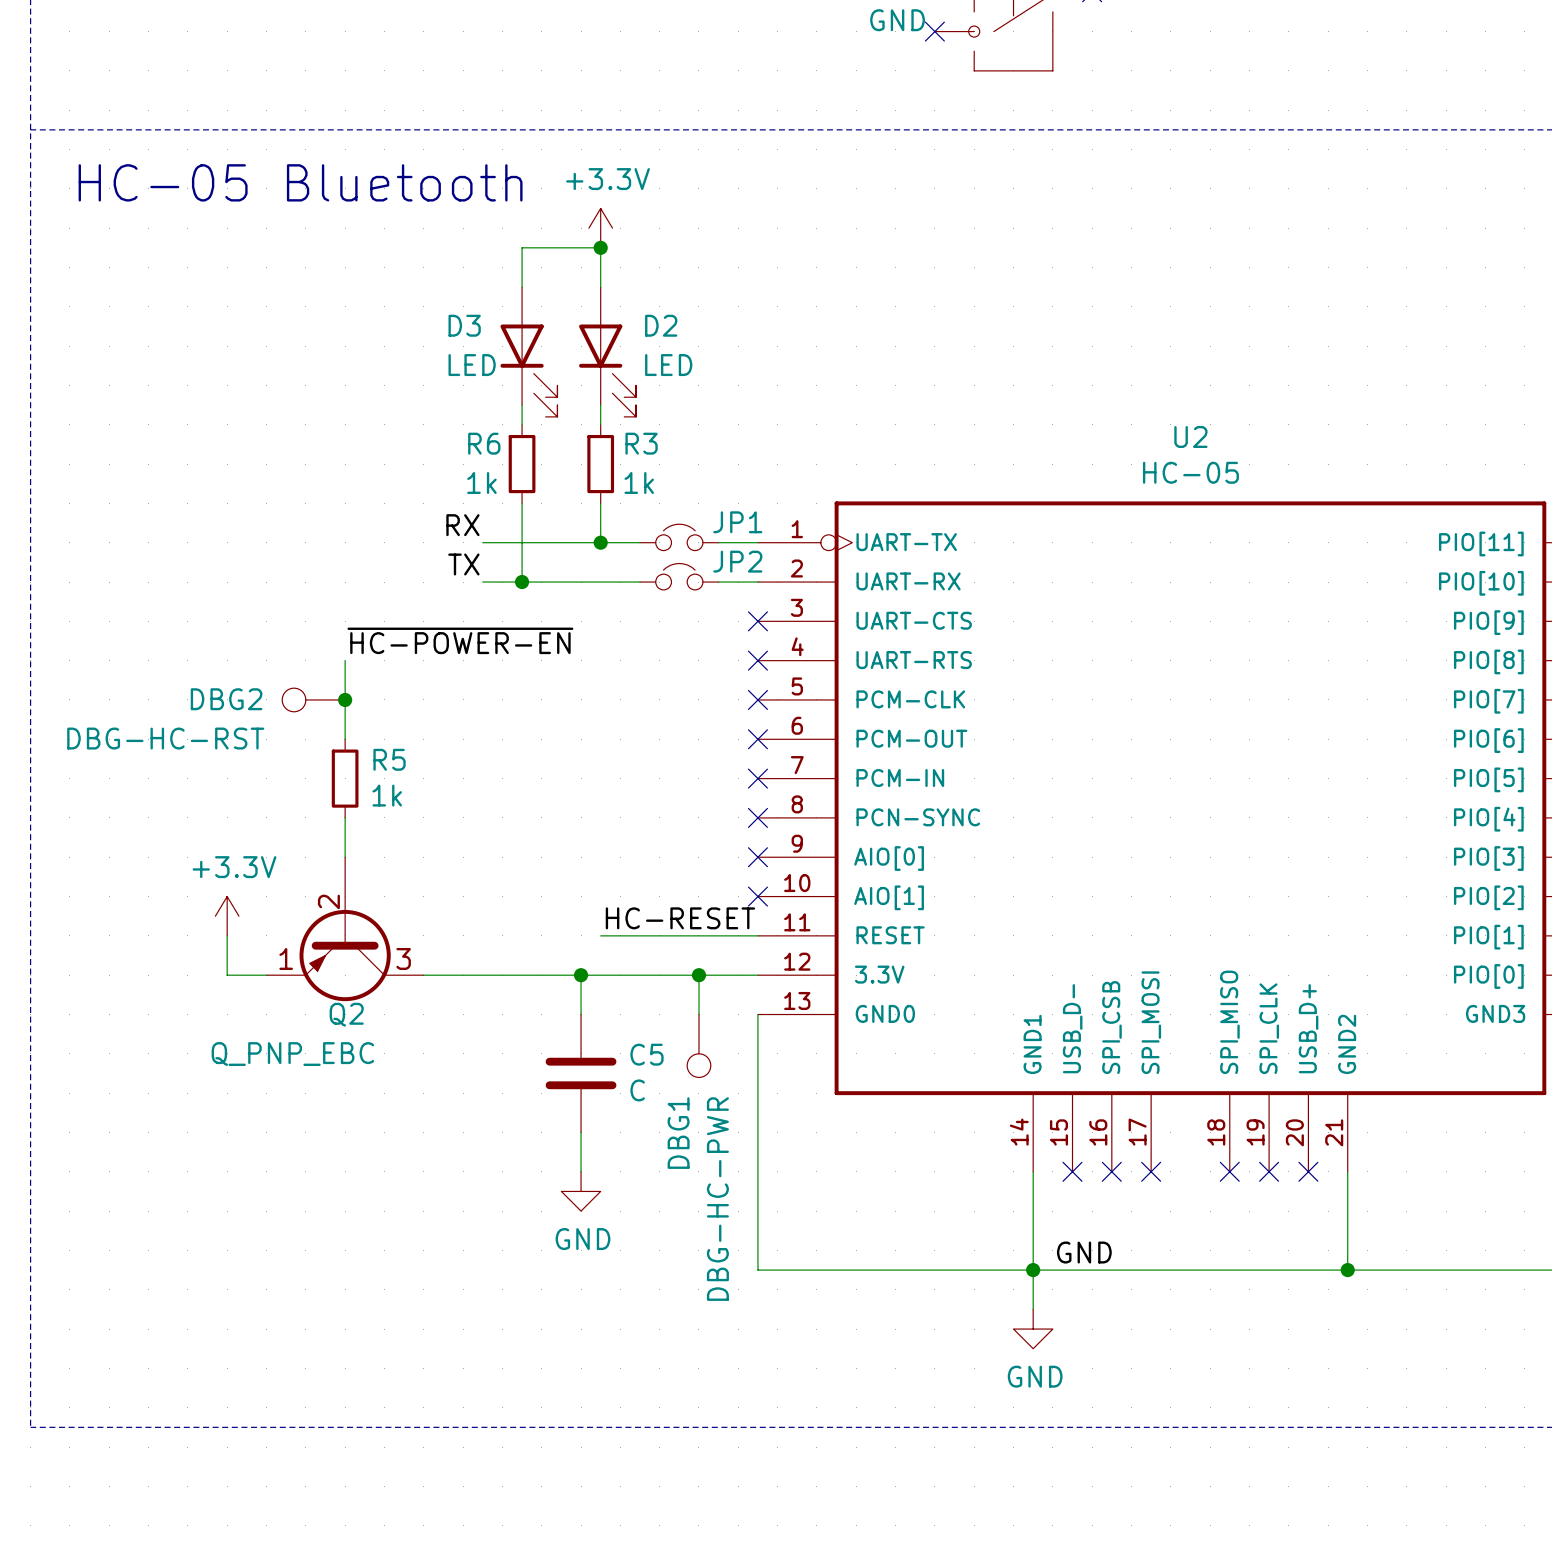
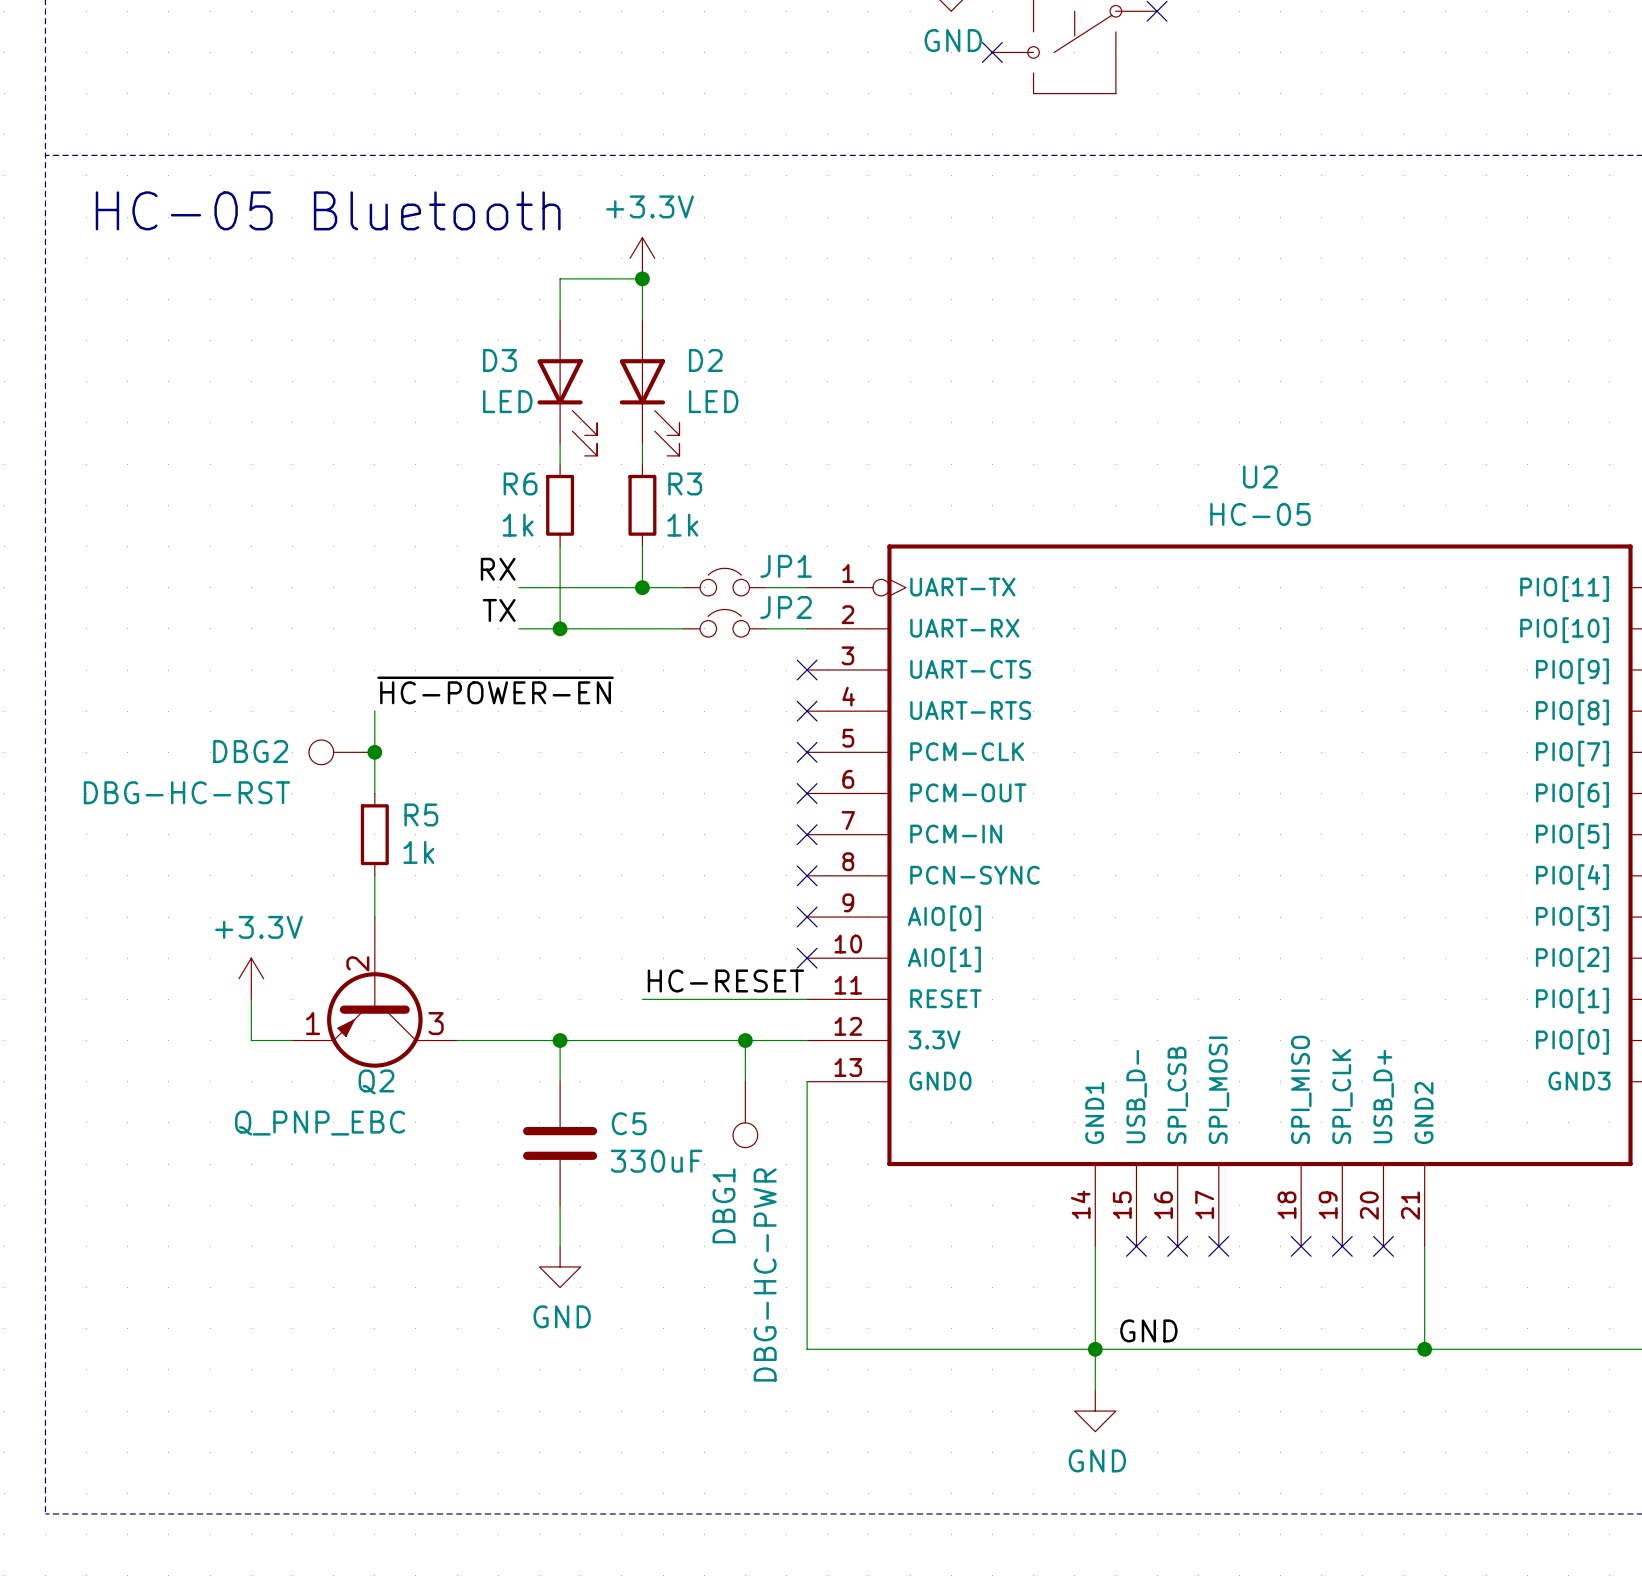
wire: (581, 975) (581, 1014) -> (560, 1040) (560, 1081)
junction position: (581, 975) -> (560, 1040)
C5 position: (581, 1073) -> (560, 1143)
C5 value: C (637, 1090) -> 330uF (656, 1161)
wire: (581, 1132) (581, 1171) -> (560, 1205) (560, 1246)
power symbol position: GND (581, 1191) -> GND (560, 1266)

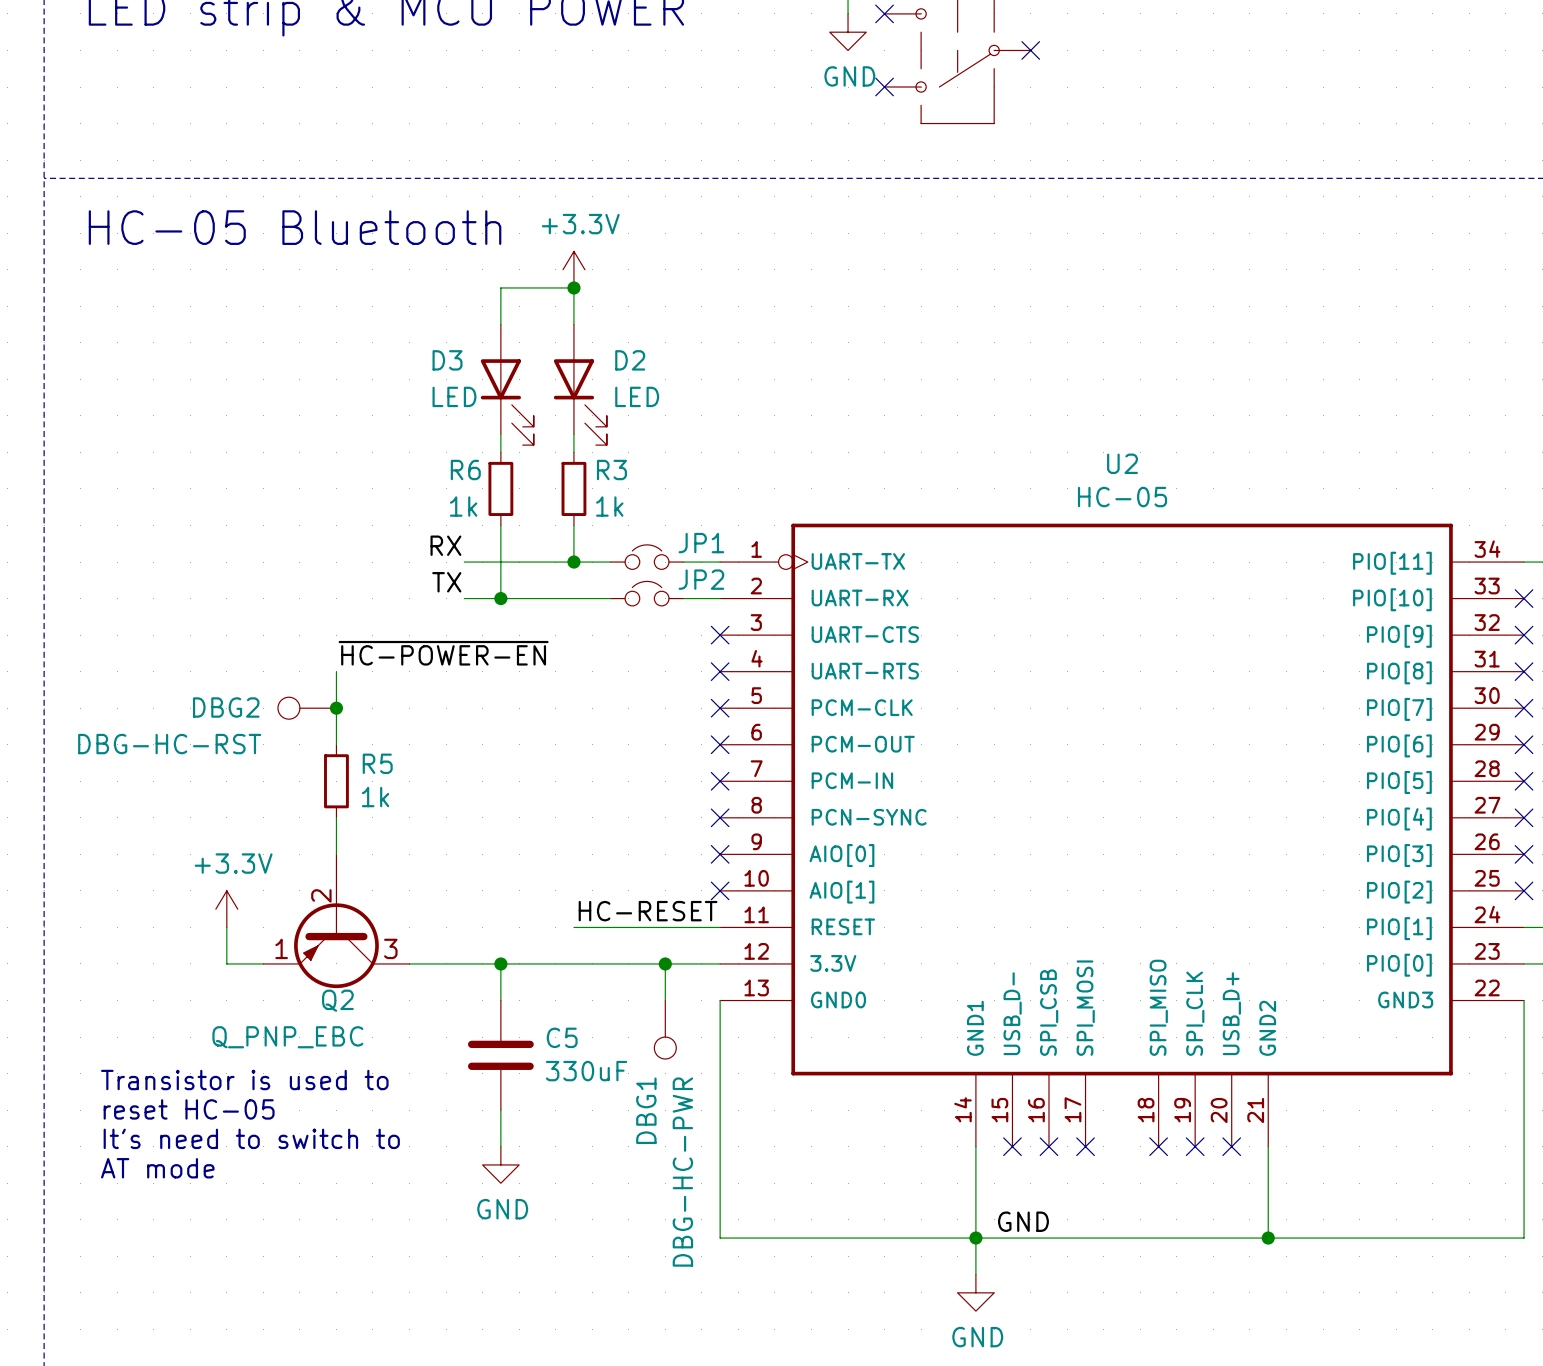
text: none -> Transistor is used to (244, 1080)
text: none -> reset HC-05 (189, 1109)
text: none -> It's need to switch to (251, 1138)
text: none -> AT mode (157, 1168)

